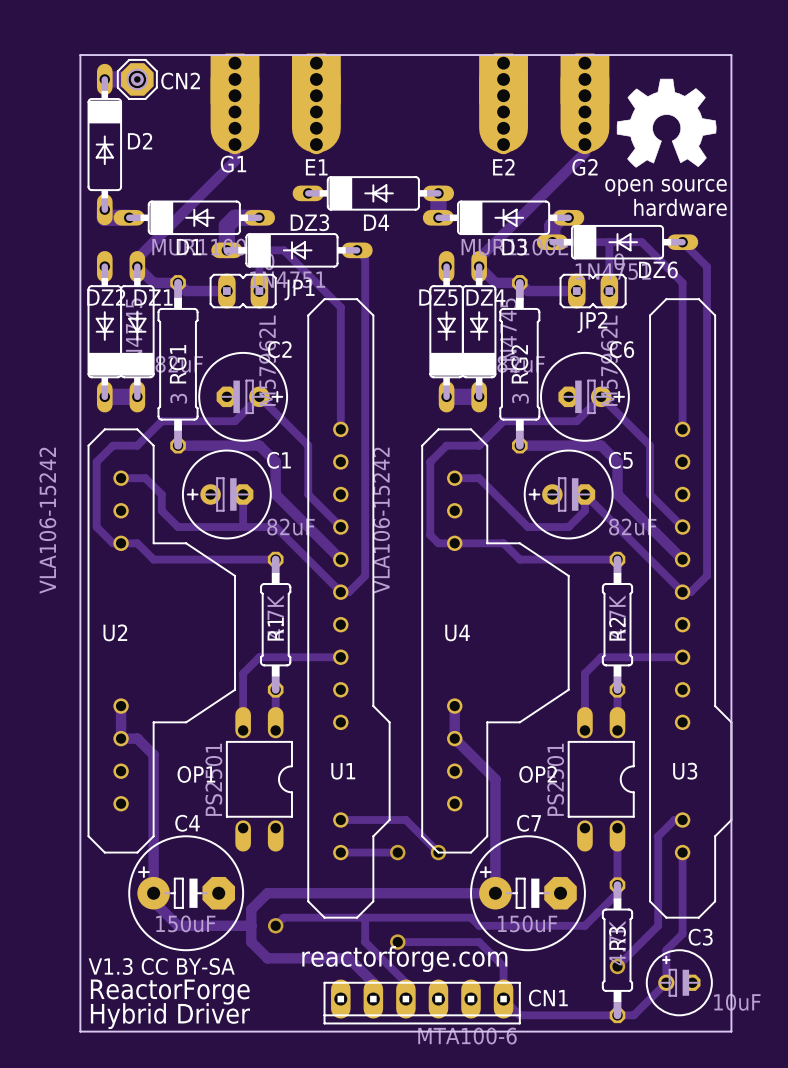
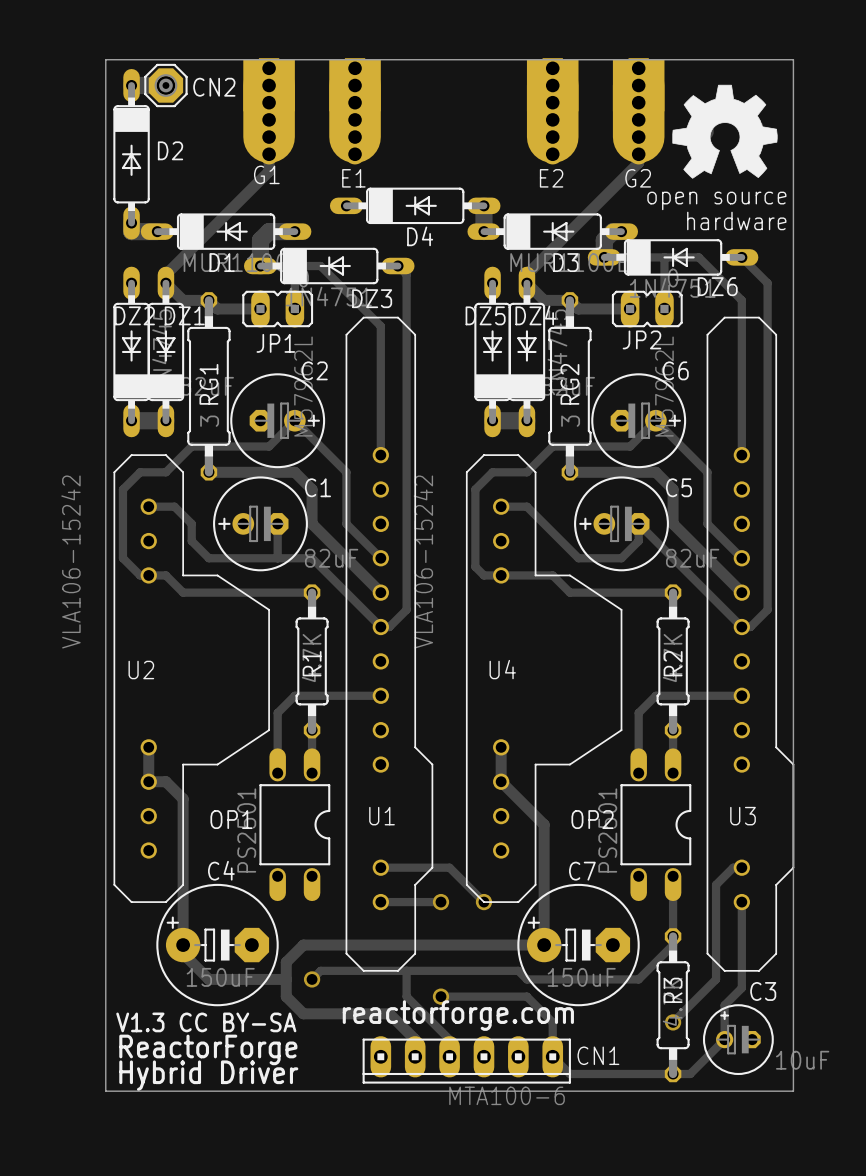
DZ3 name position: DZ3 (309, 222) -> DZ3 (372, 298)
JP1 name position: JP1 (299, 290) -> JP1 (275, 343)

